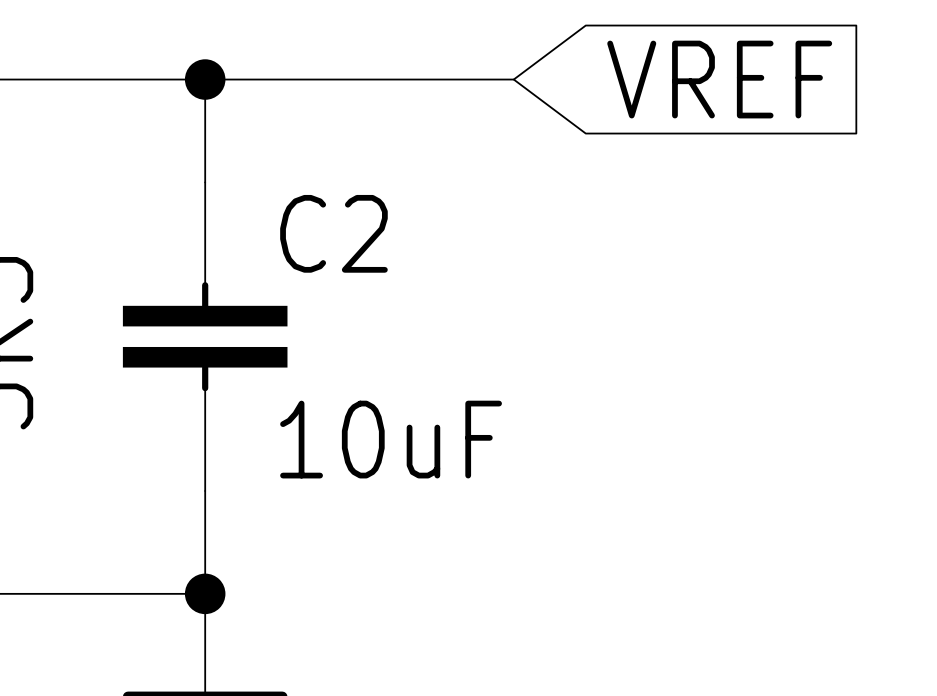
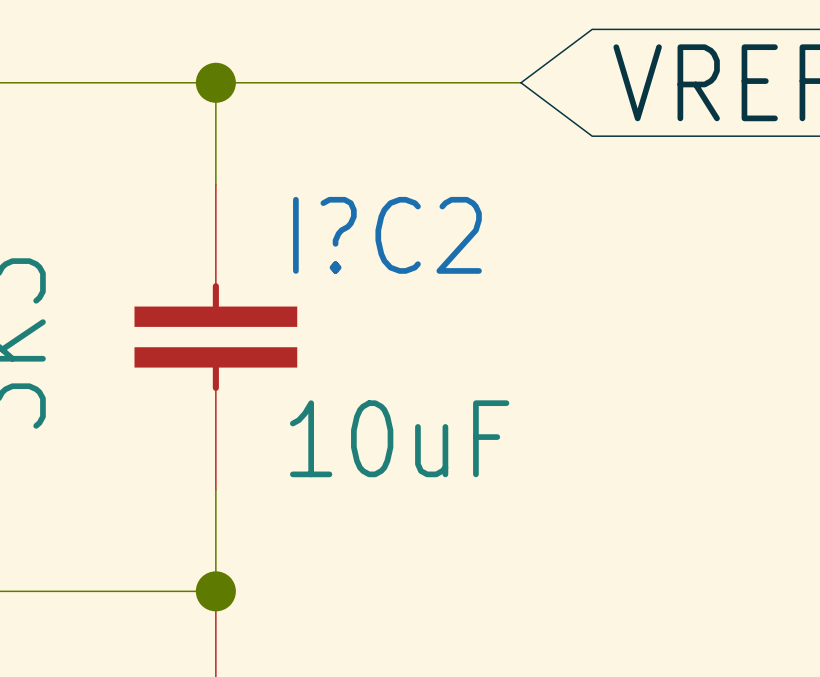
C2 name: C2 (333, 233) -> I?C2 (387, 235)

